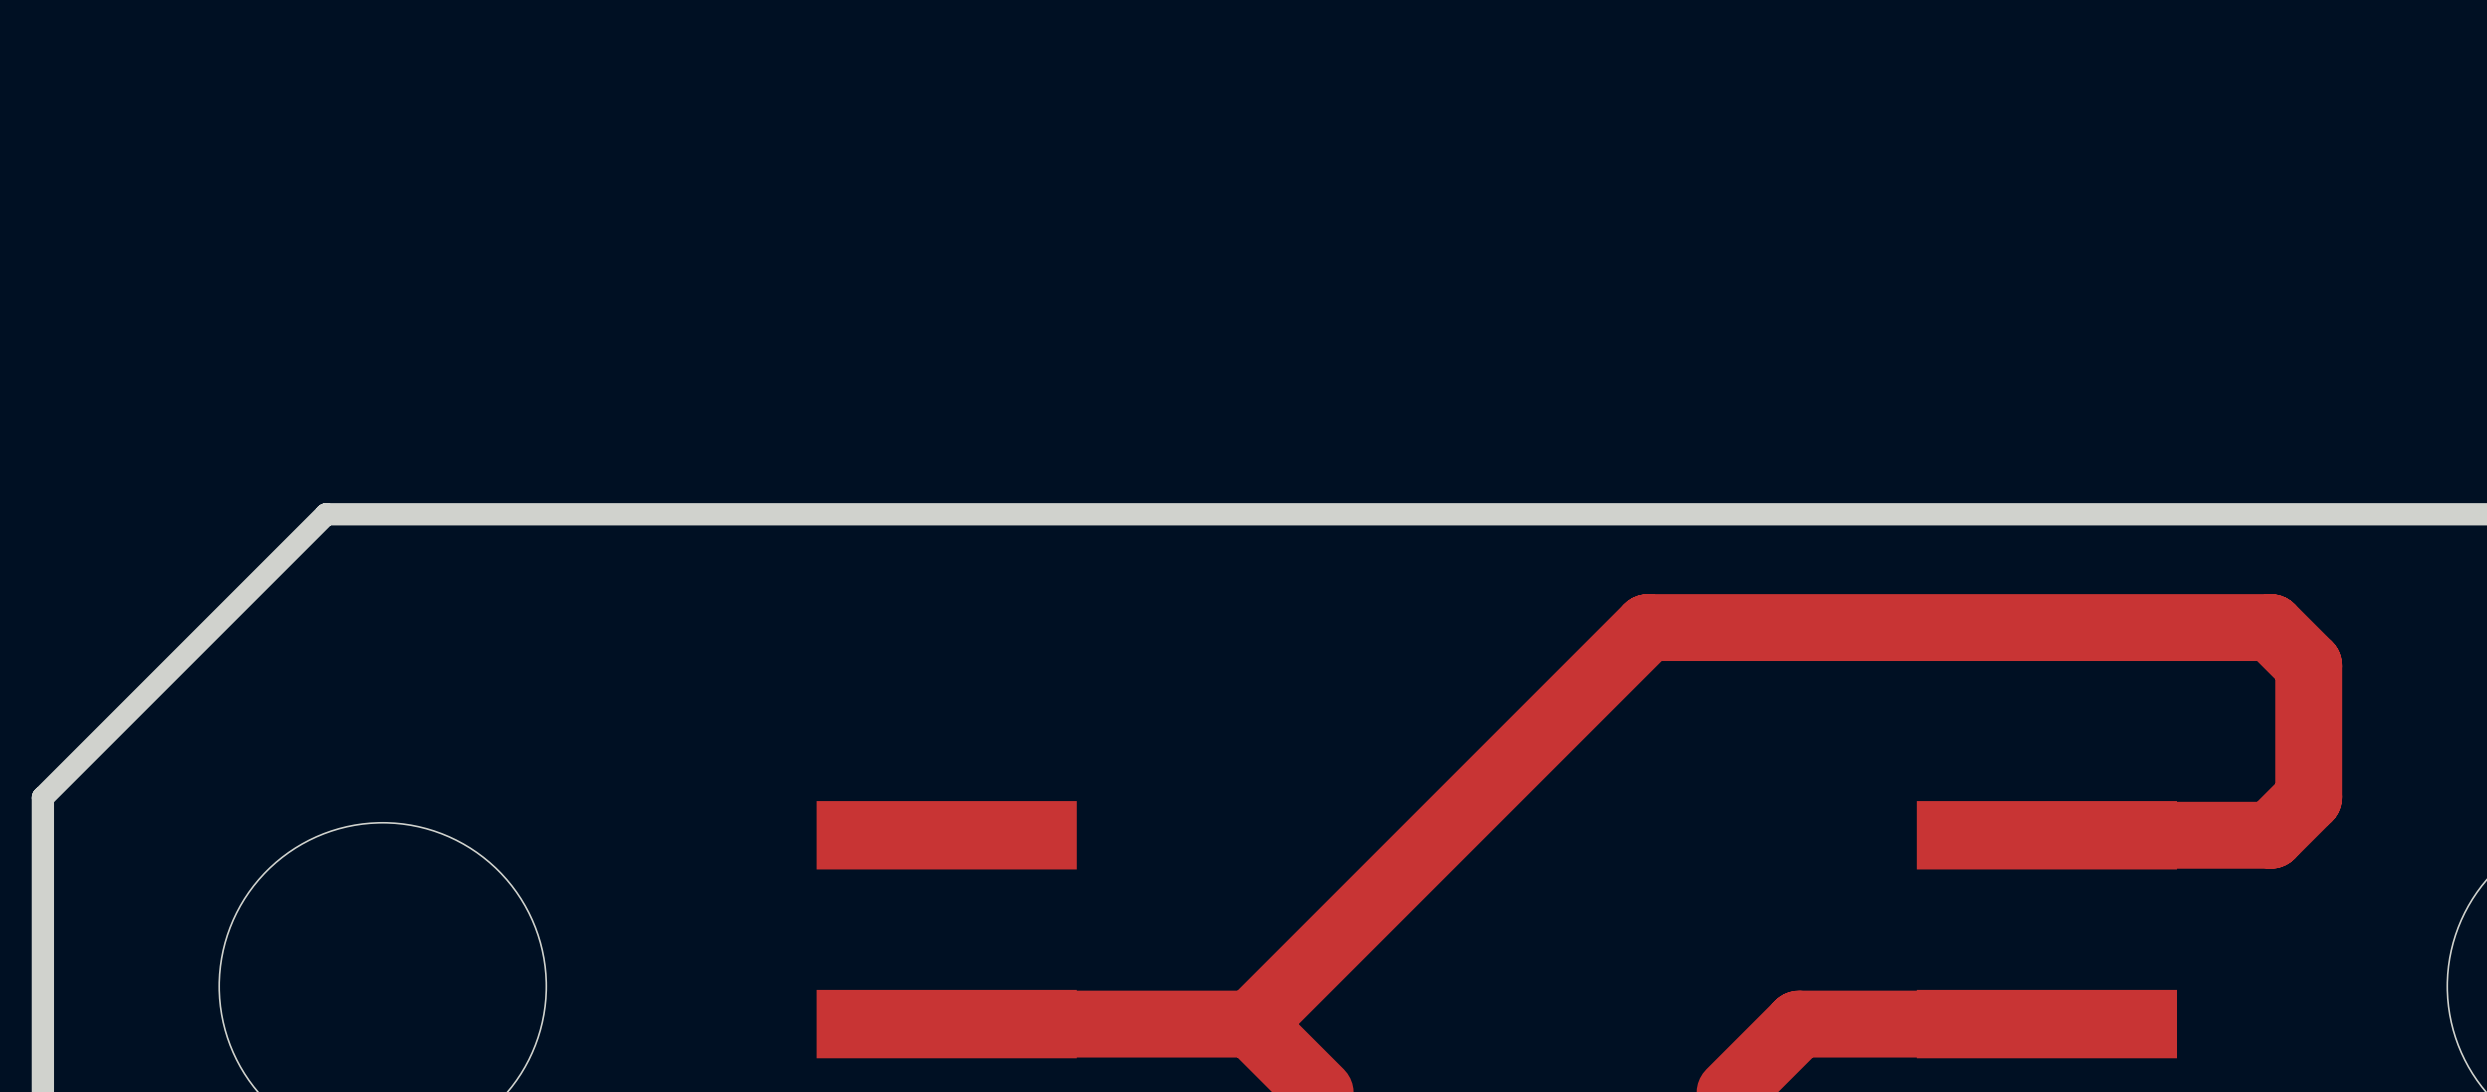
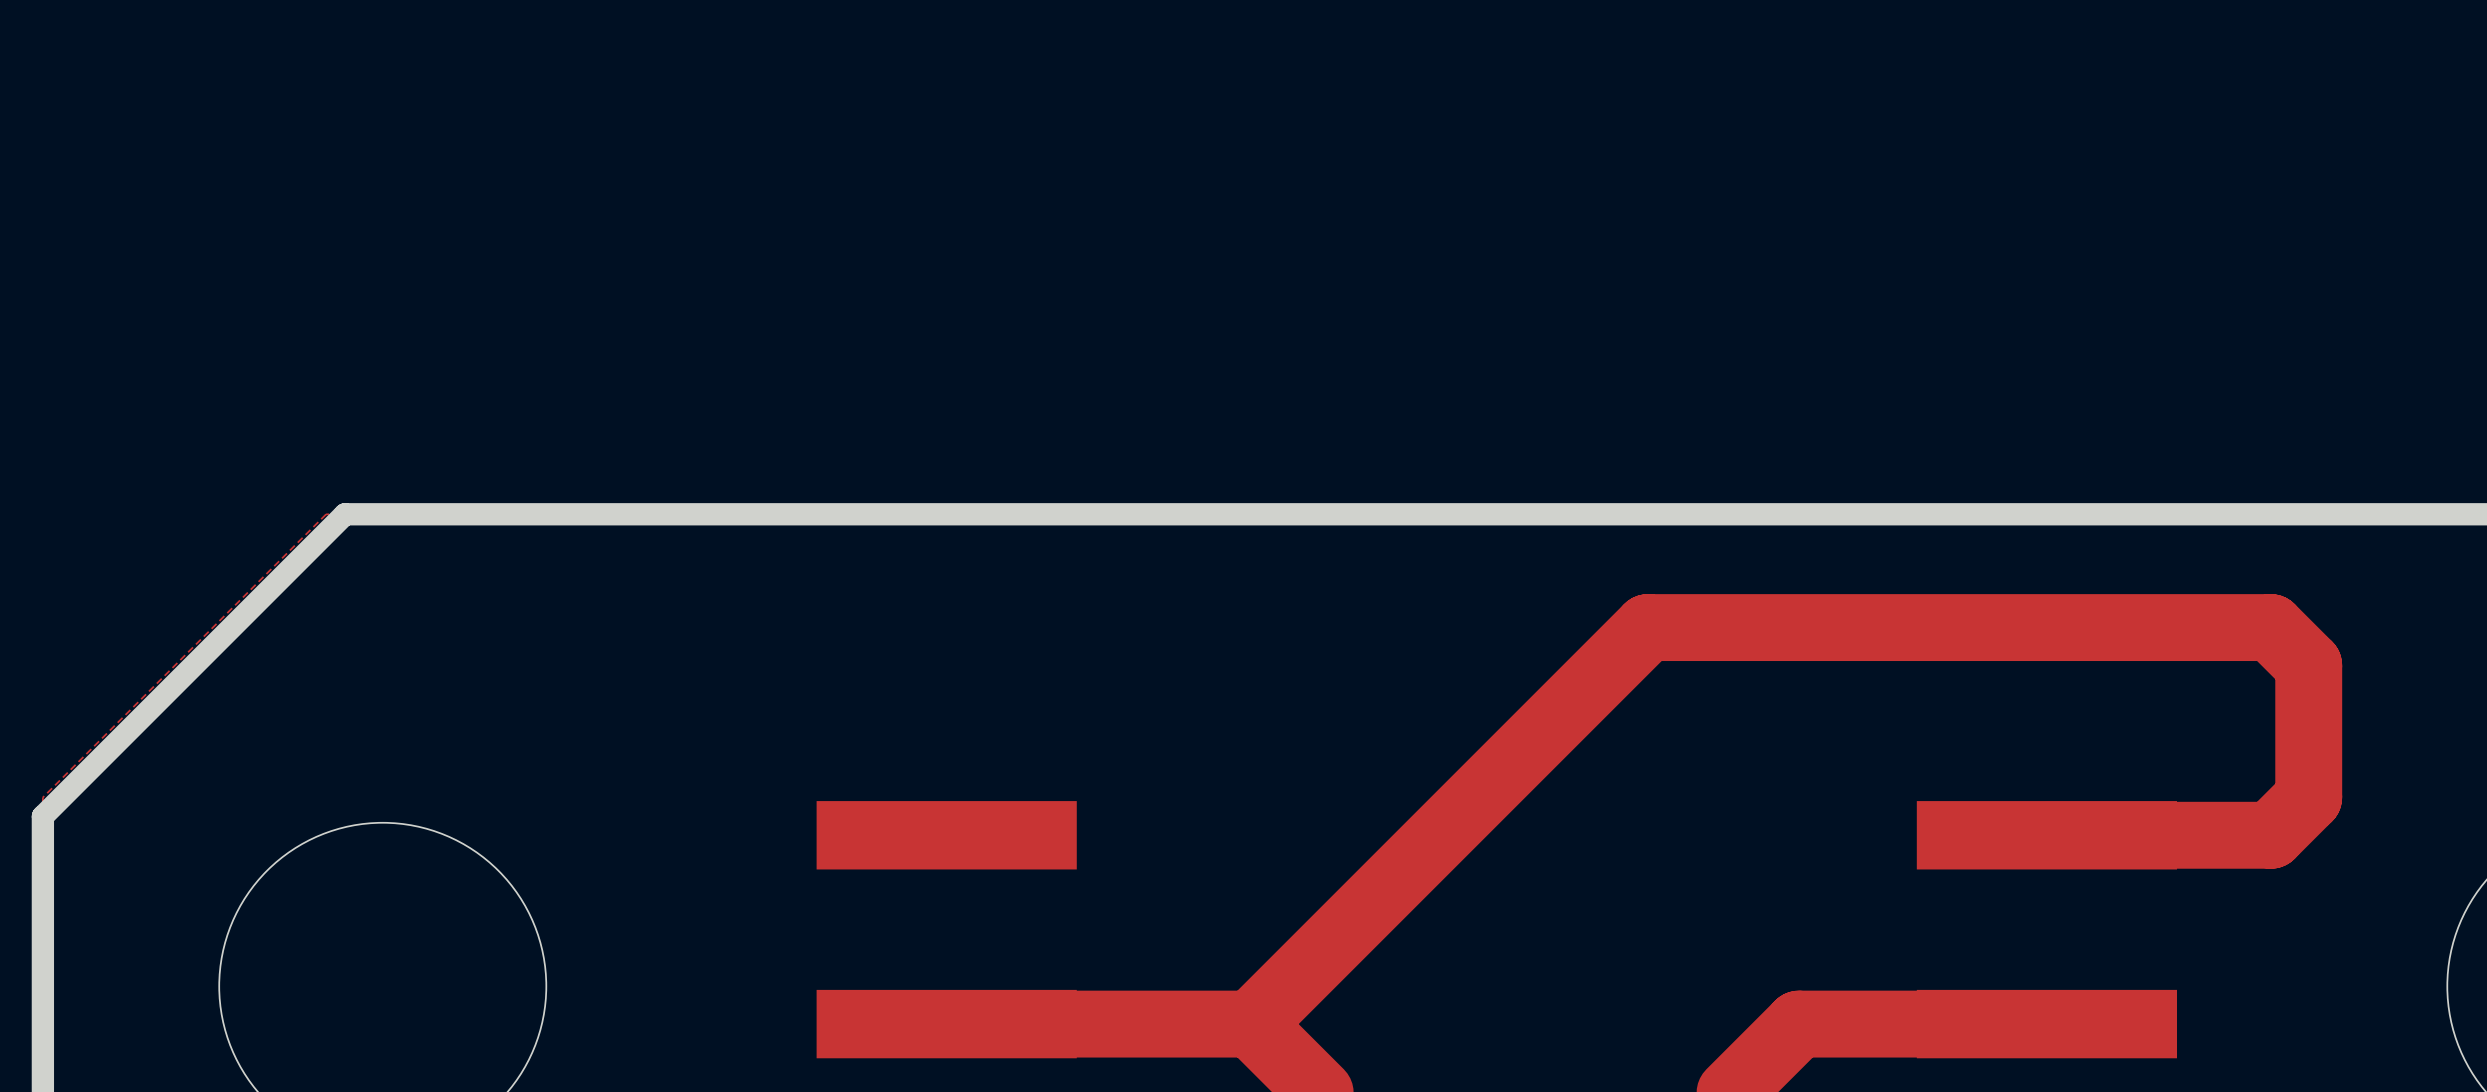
board edge: (345, 514) (326, 514) (42, 797) (42, 816) -> (345, 514) (42, 816)

